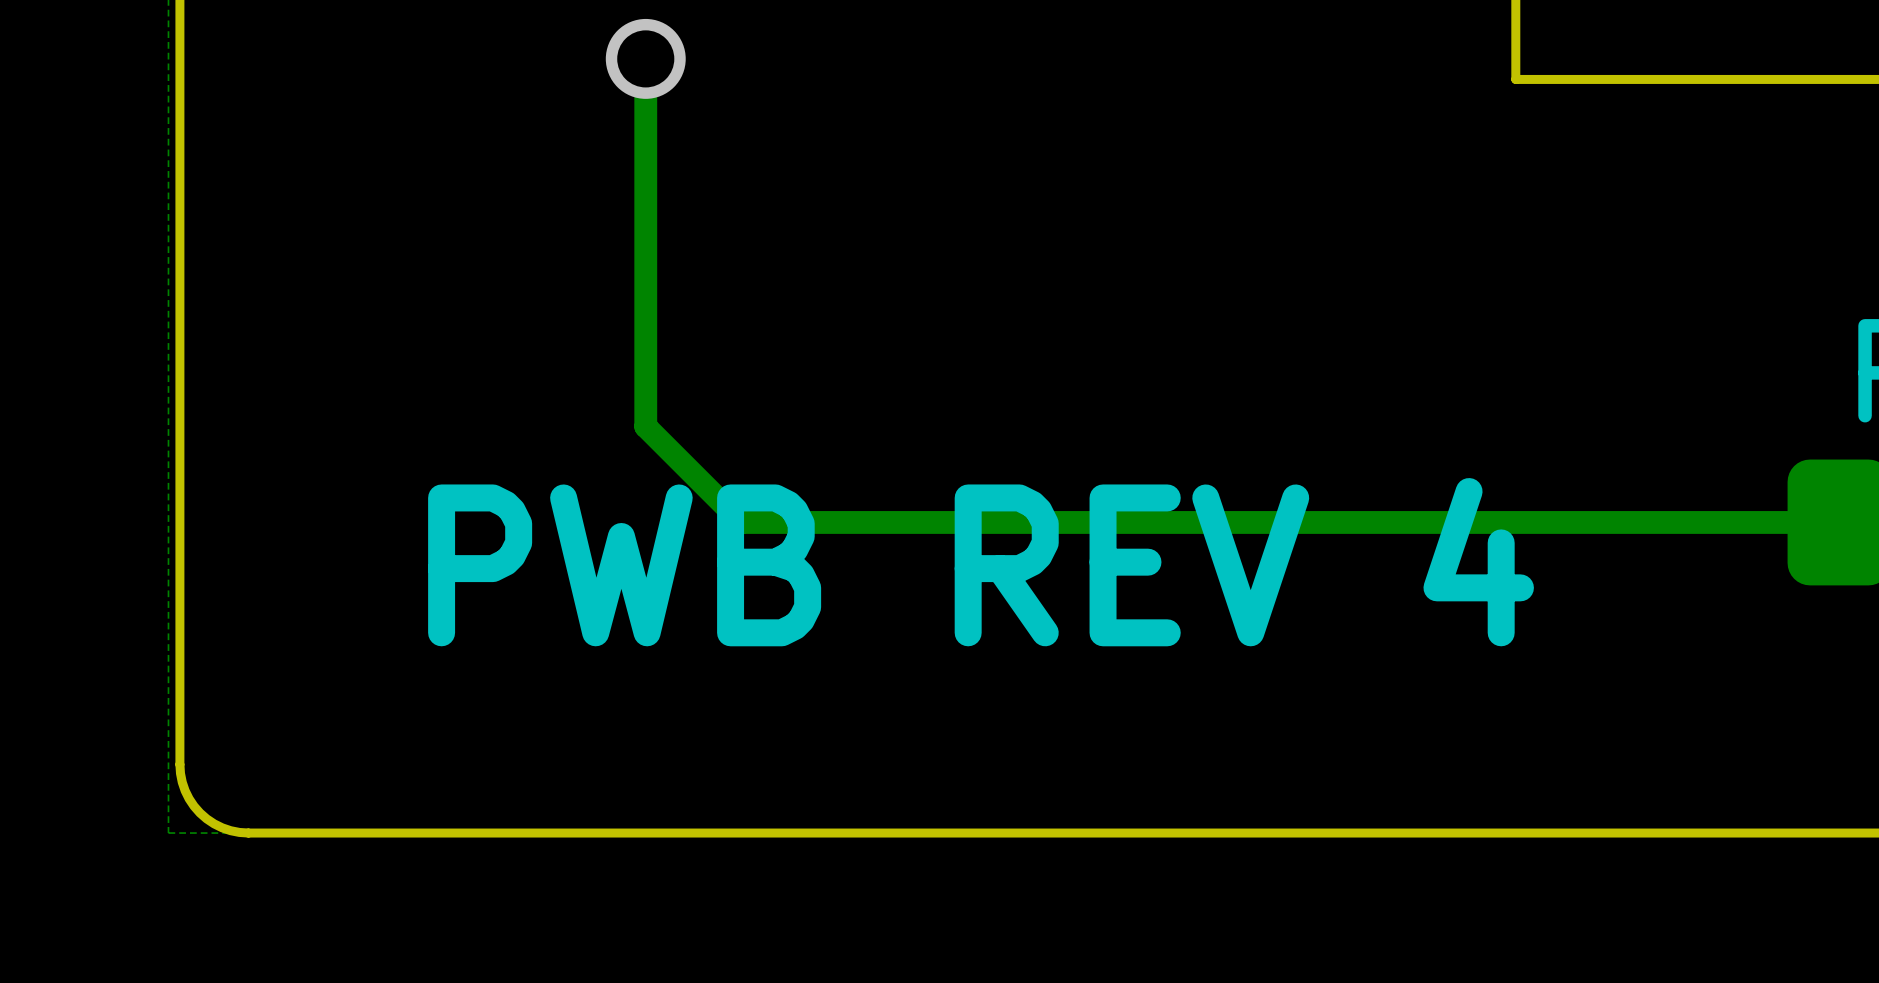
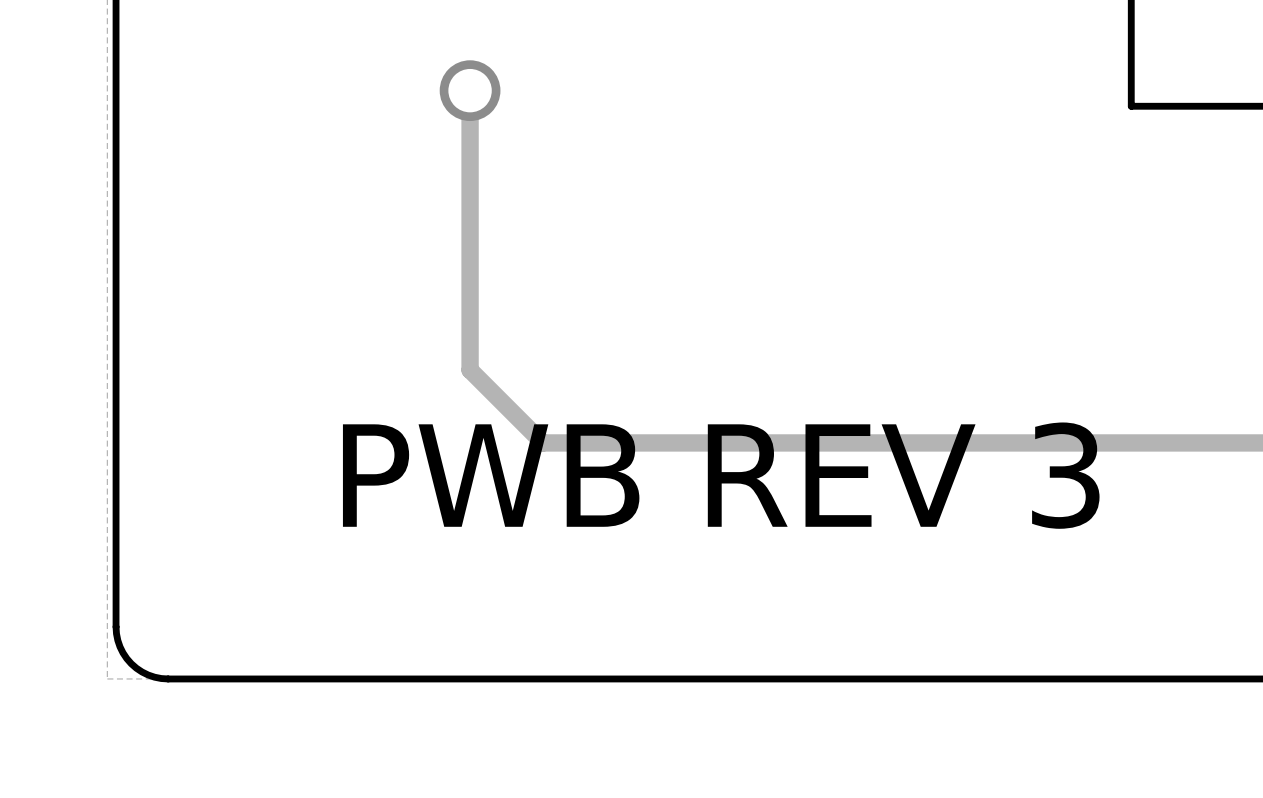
text: PWB REV 4 (981, 562) -> PWB REV 3 (721, 475)

